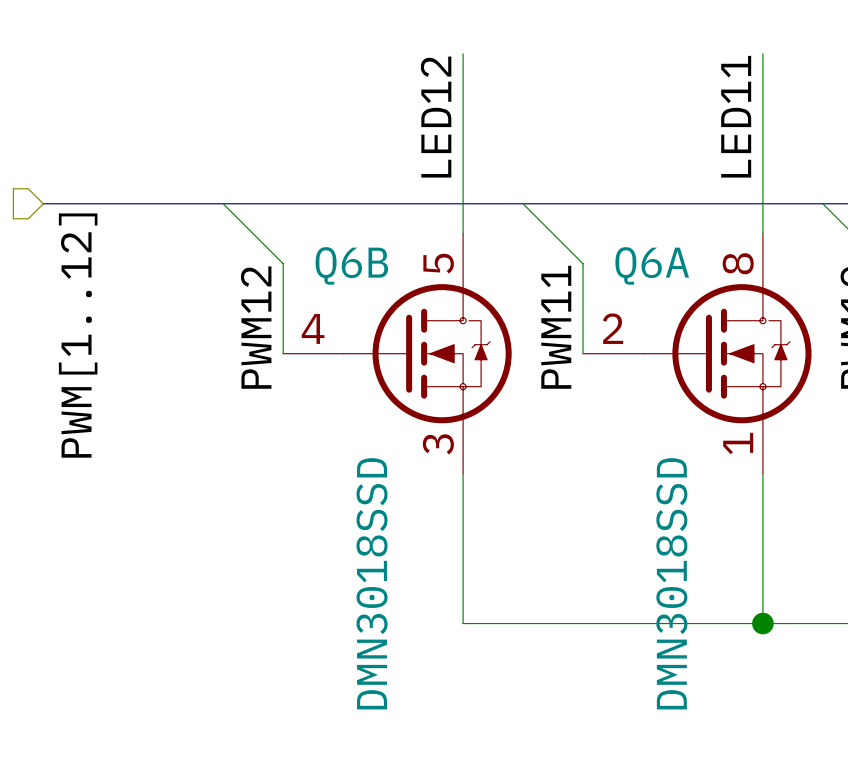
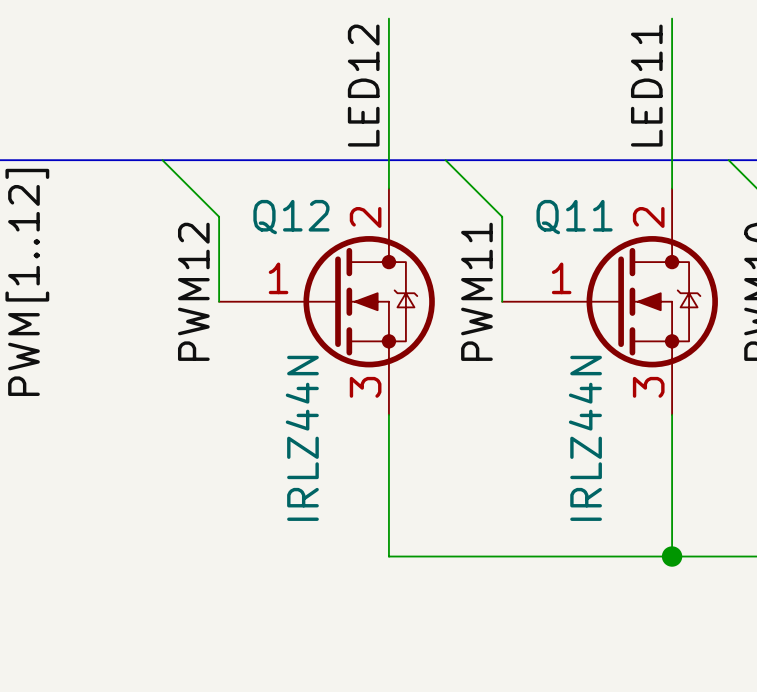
Q6B: DMN3018SSD (397, 353) -> none
Q12: none -> IRLZ44N (326, 301)
Q6A: DMN3018SSD (697, 353) -> none
Q11: none -> IRLZ44N (610, 301)

